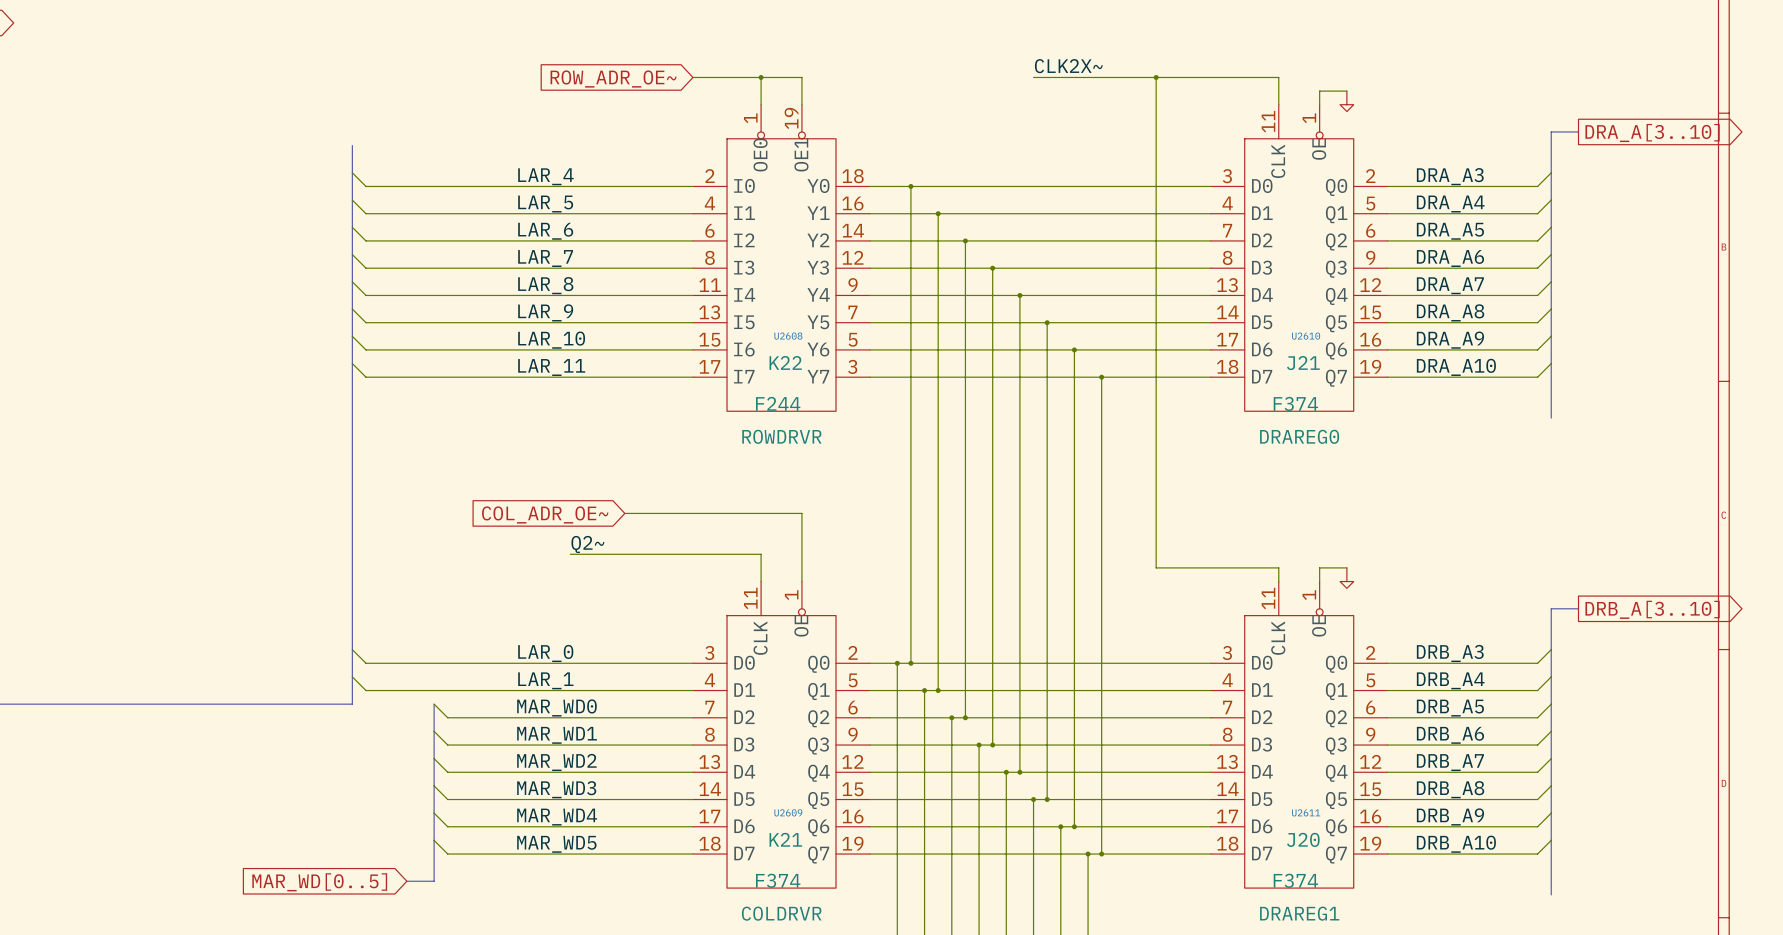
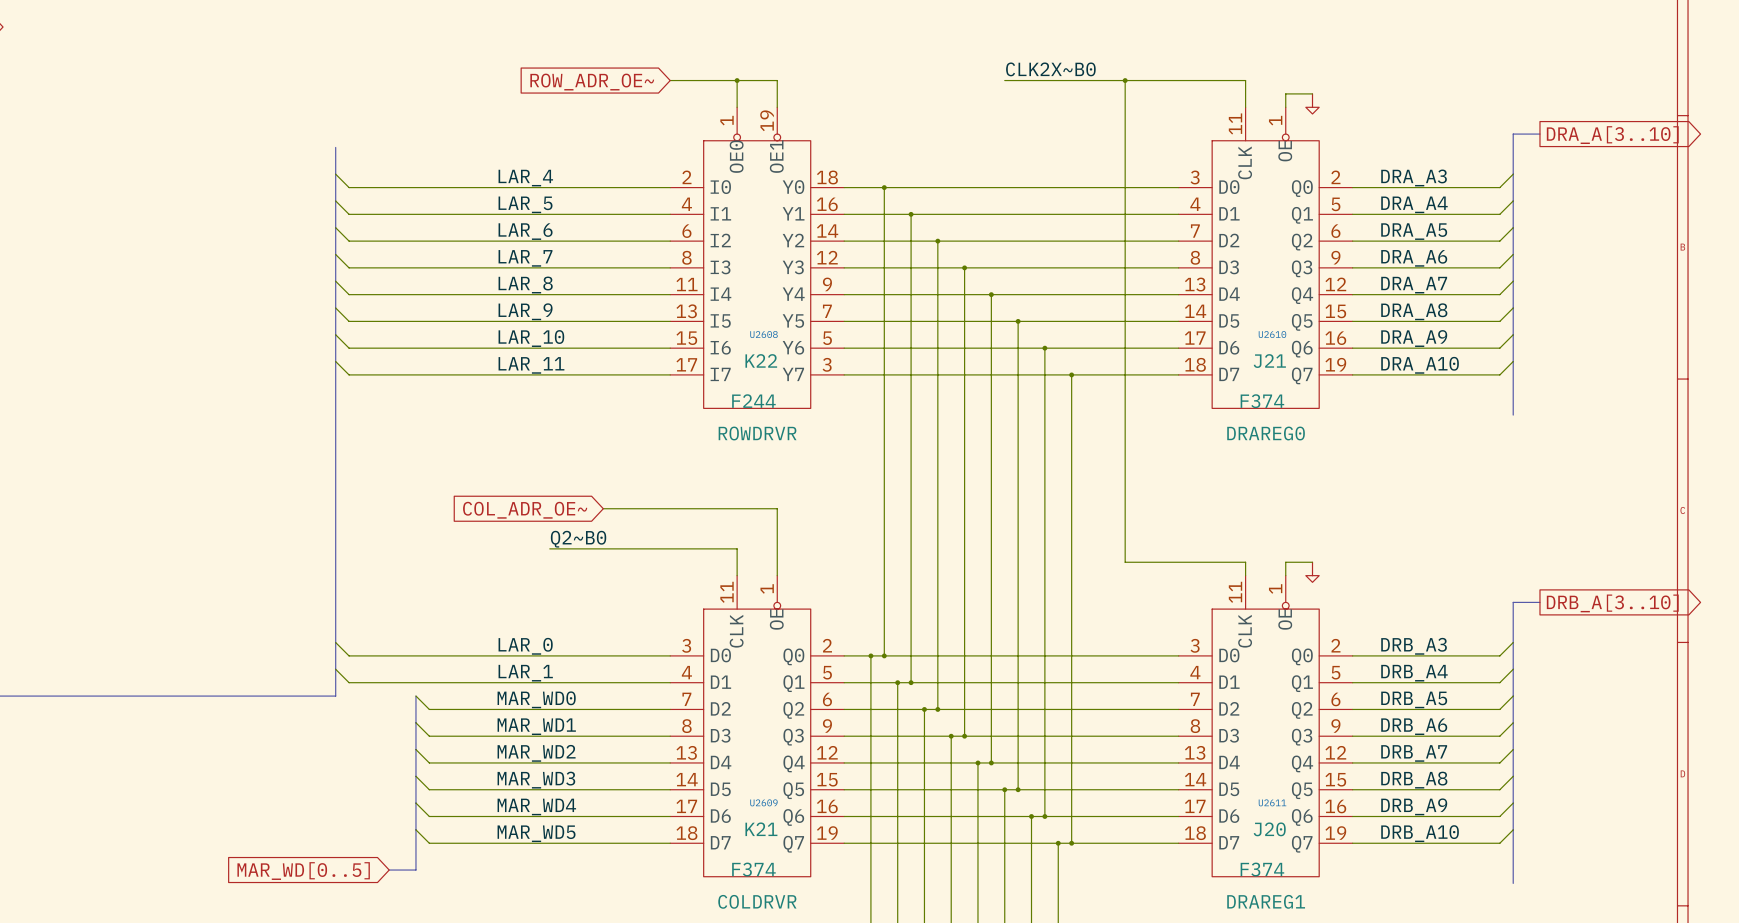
label: CLK2X~ (1068, 66) -> CLK2X~B0 (1050, 69)
label: Q2~ (587, 544) -> Q2~B0 (578, 539)

